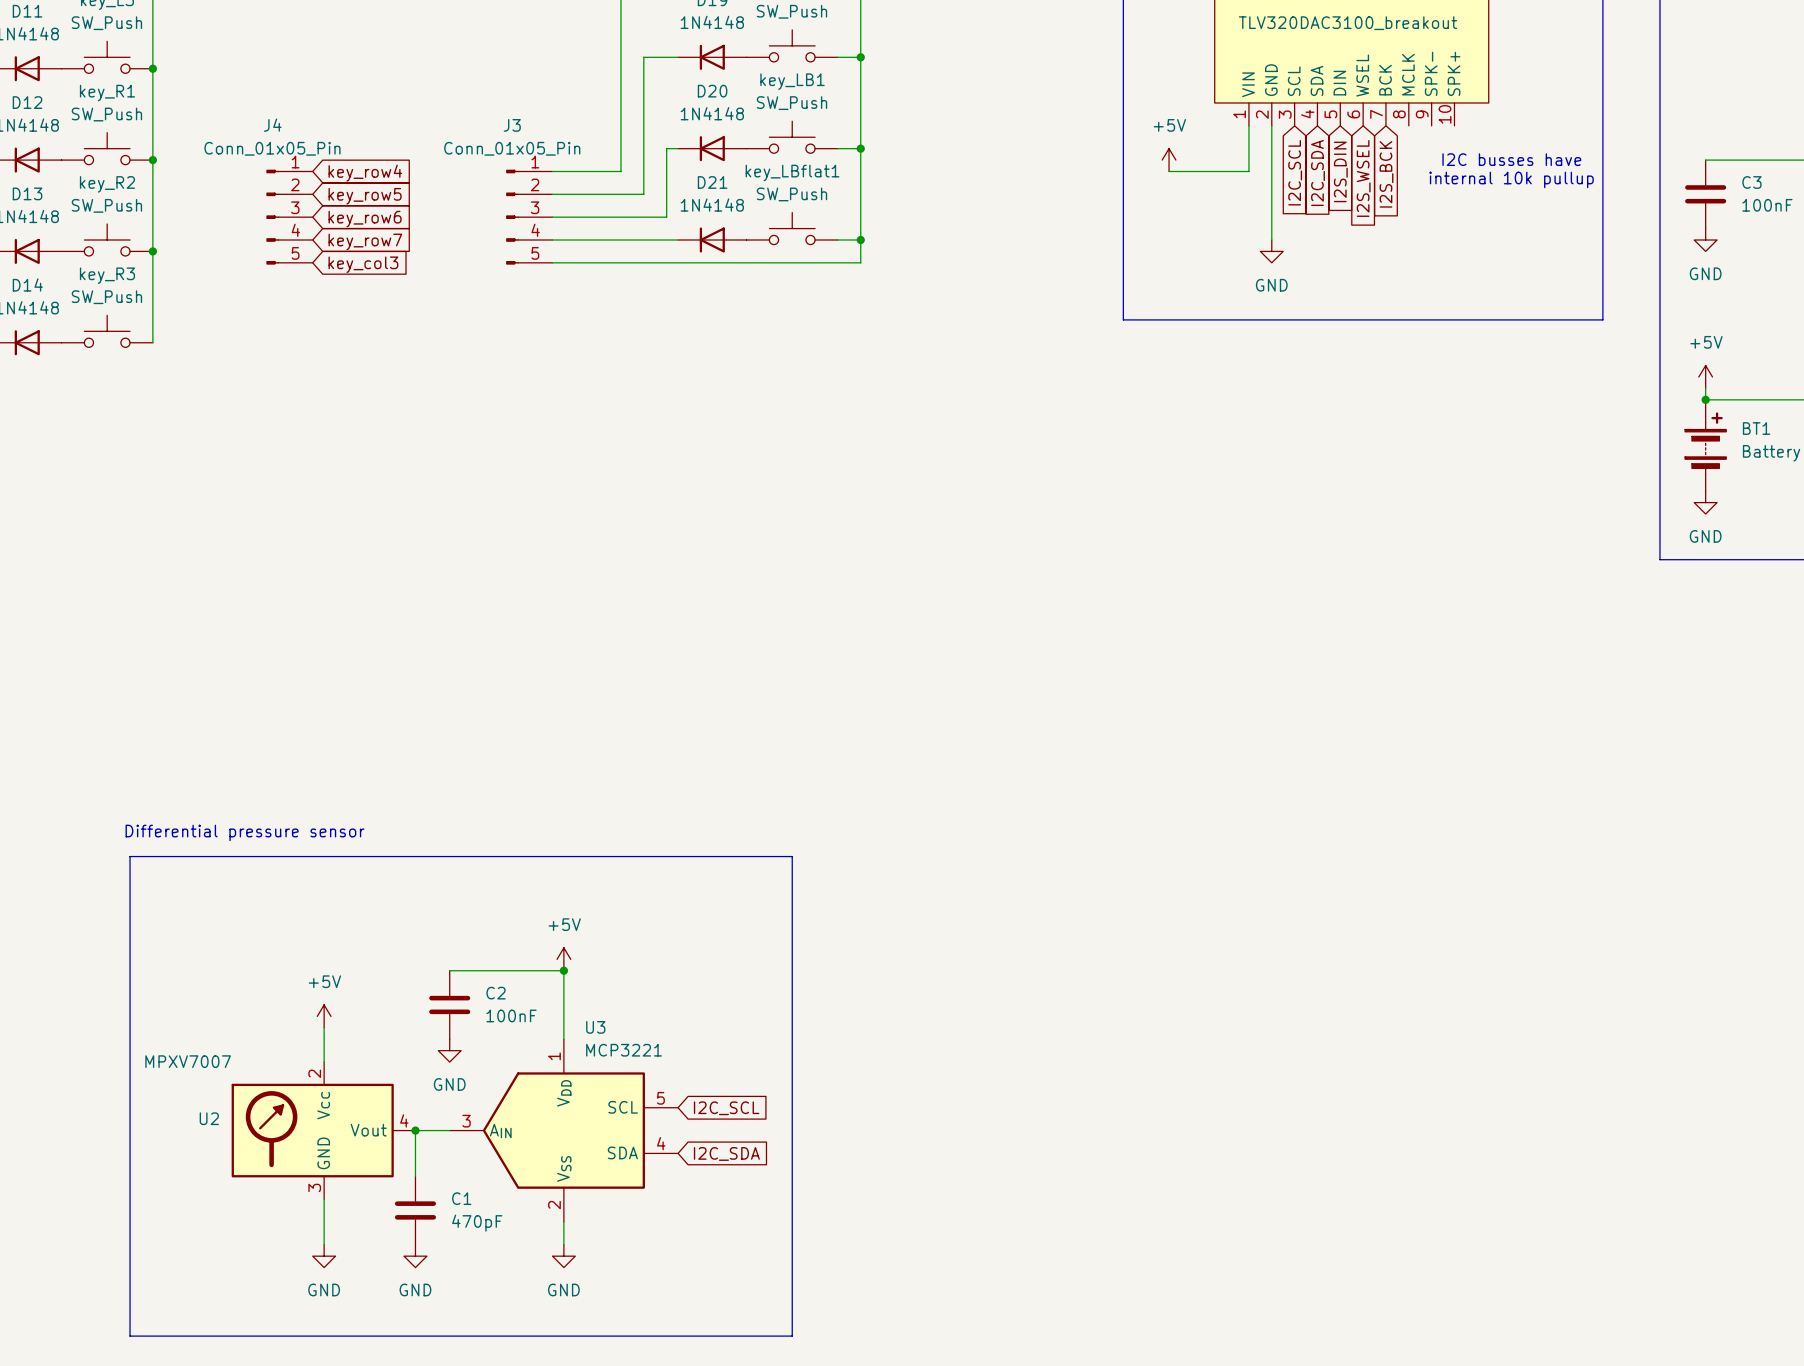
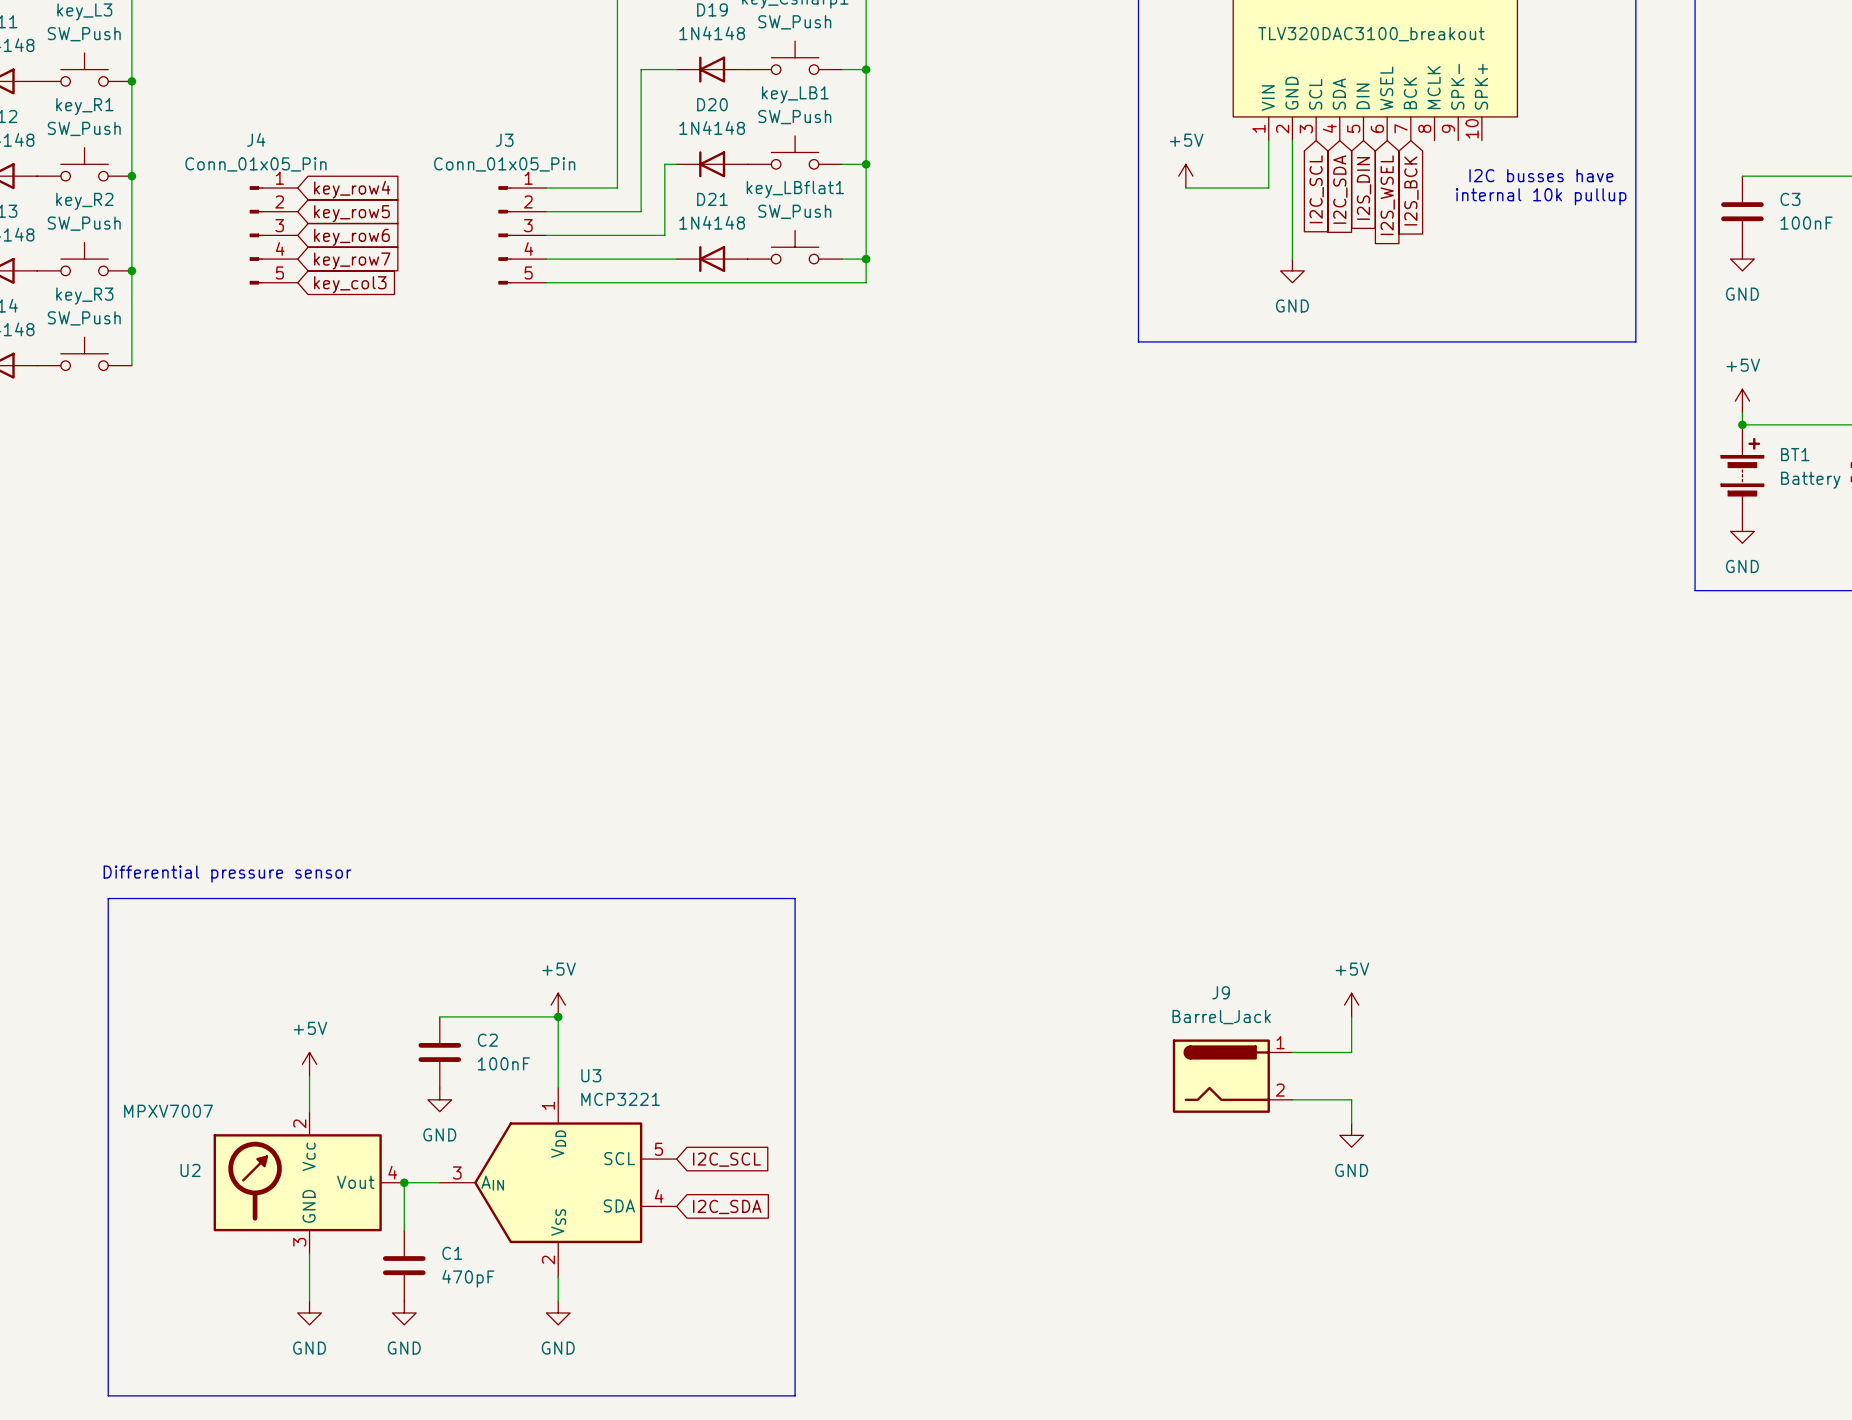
power symbol: none -> +5V (1351, 1005)
wire: none -> (1351, 1016) (1351, 1052) (1292, 1052)
J9: none -> Barrel_Jack (1232, 1076)
wire: none -> (1292, 1099) (1351, 1099) (1351, 1123)
power symbol: none -> GND (1351, 1135)

